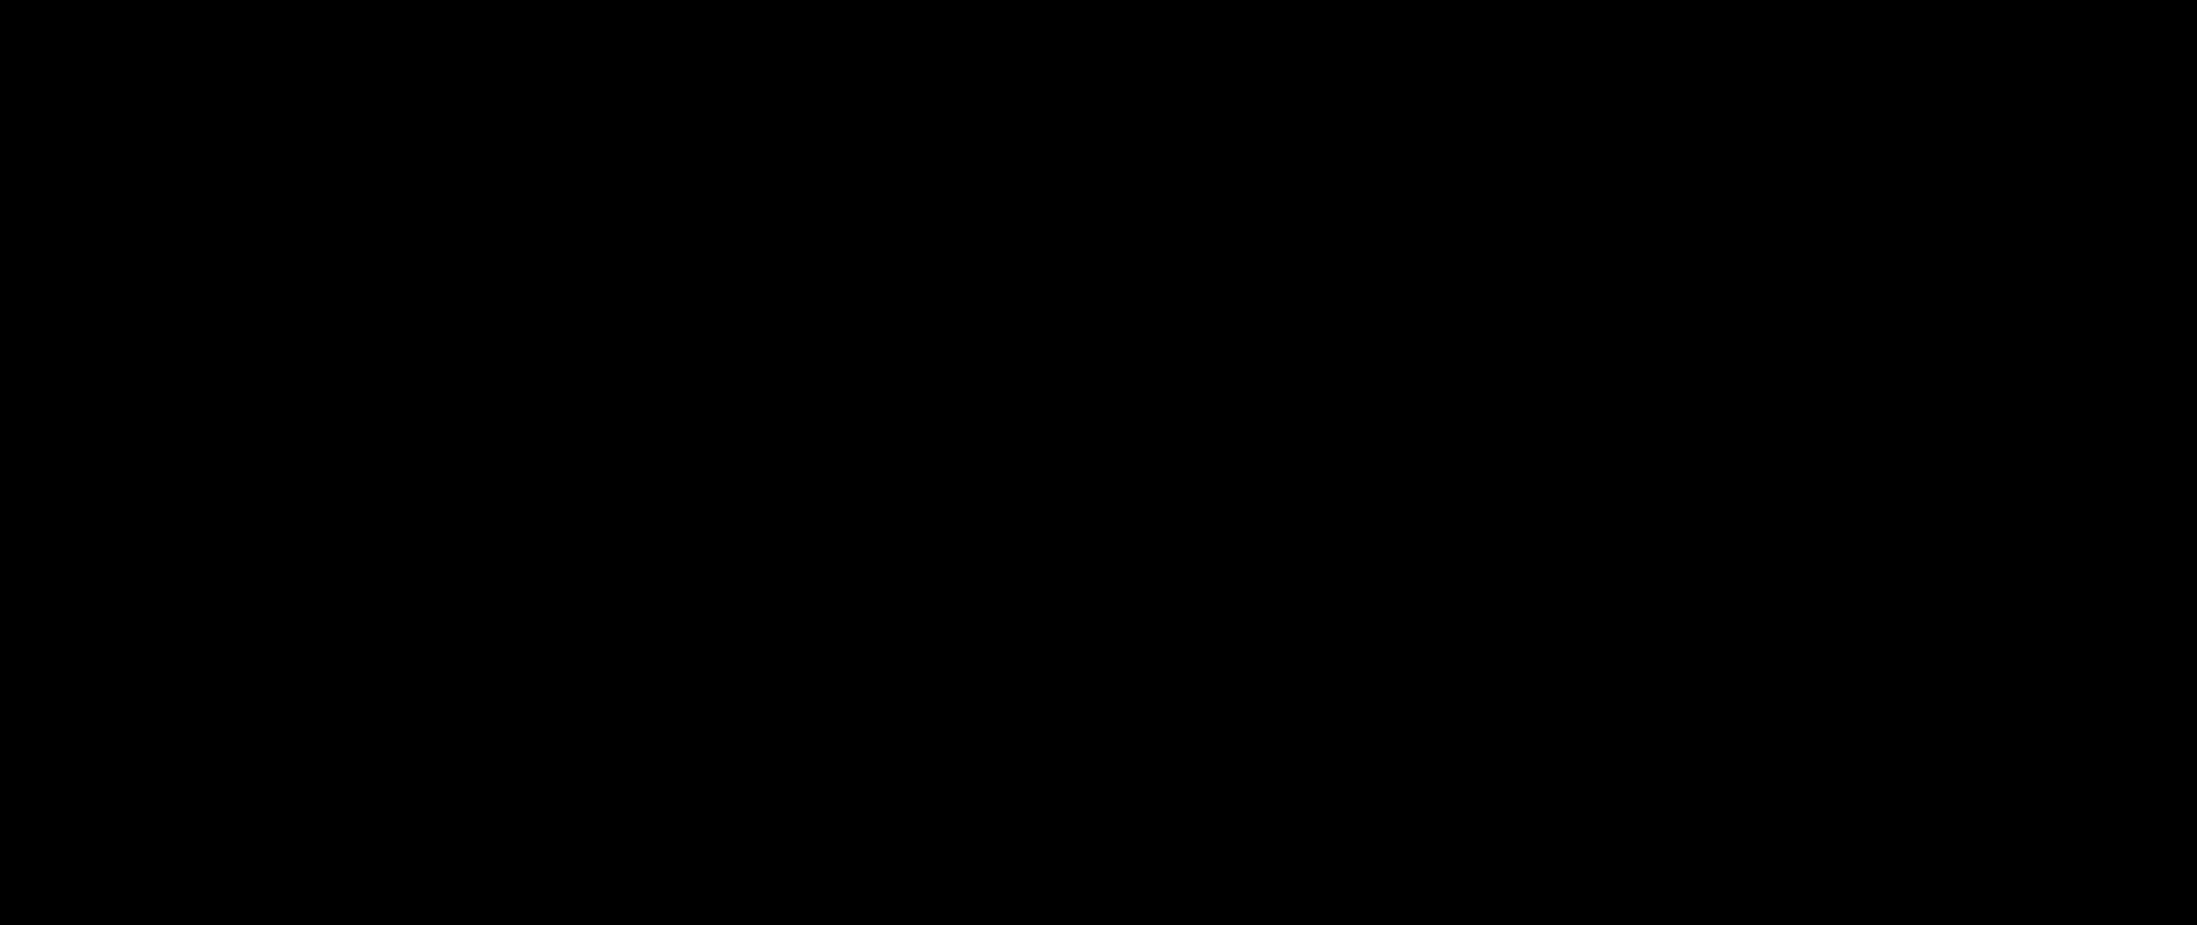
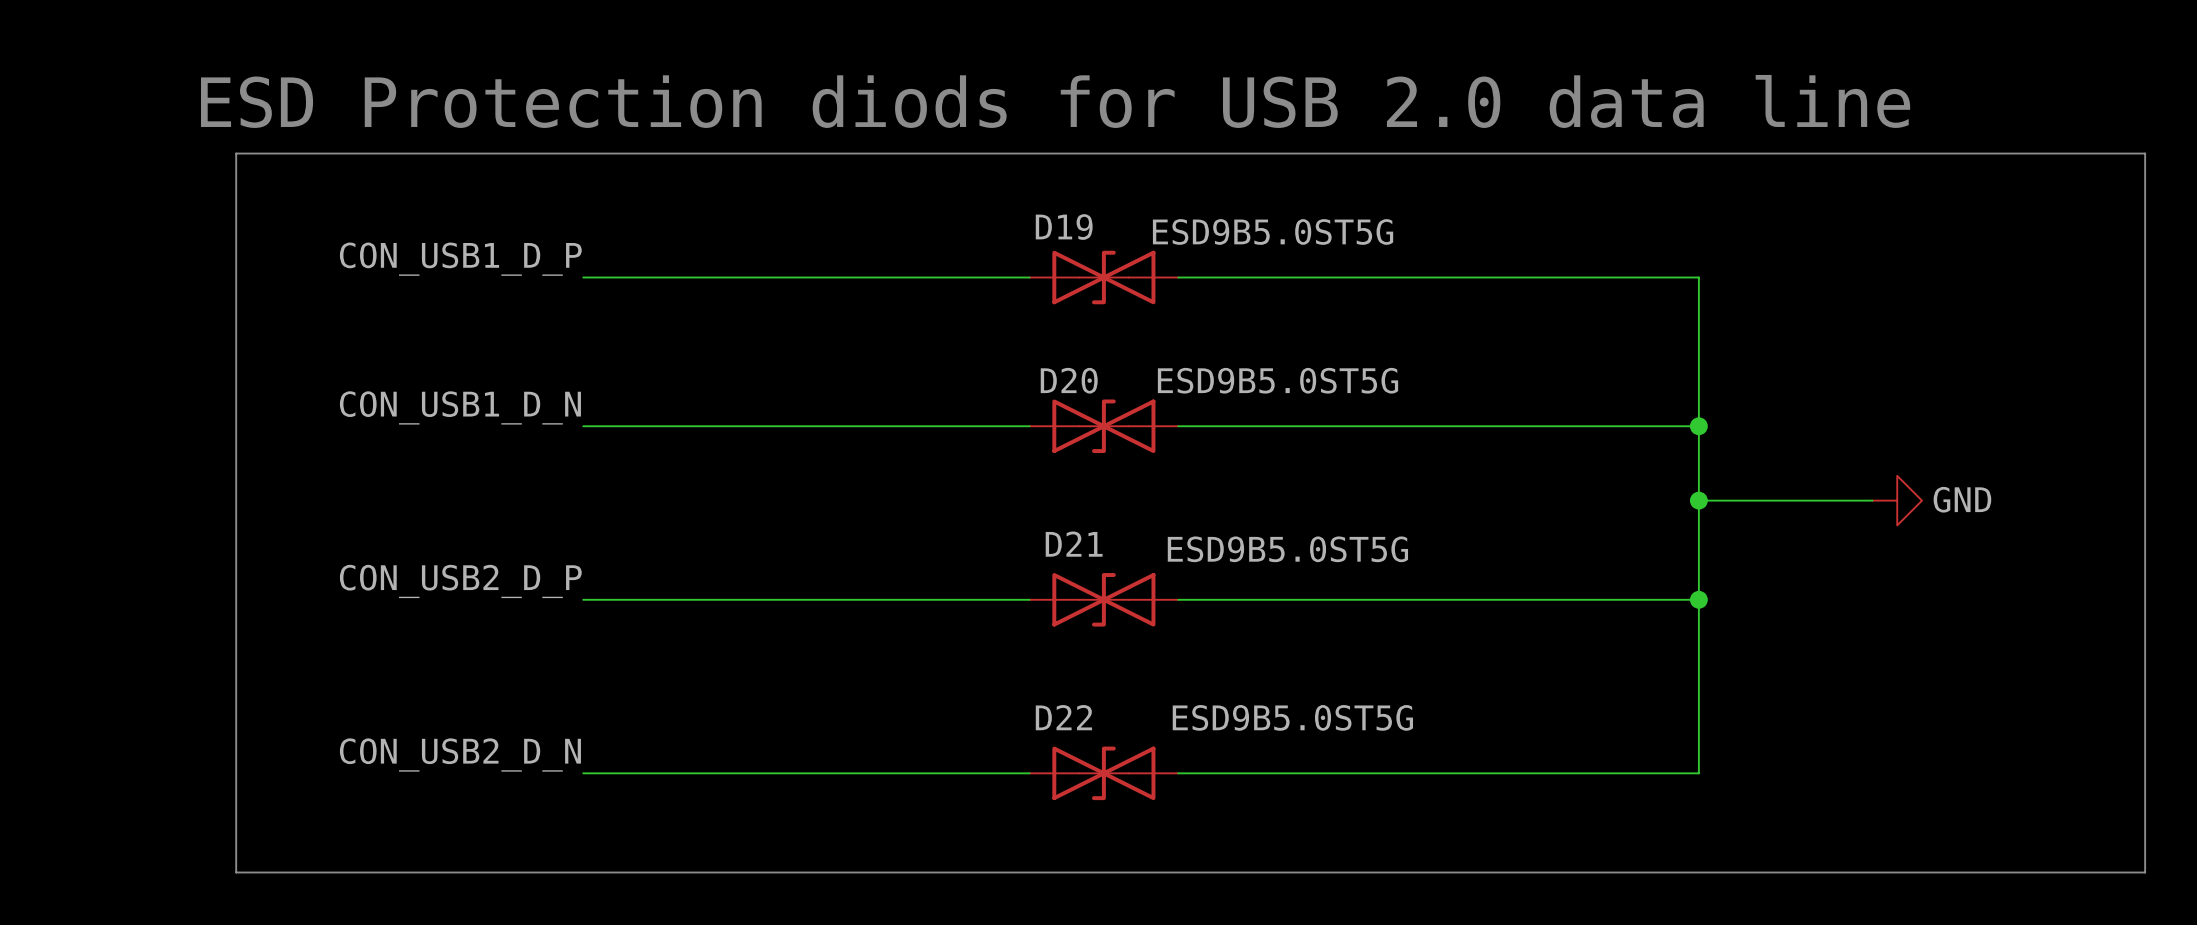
text: none -> ESD Protection diods for USB 2.0 data line (1055, 101)
line: none -> (236, 153) (2145, 153) (2145, 872) (236, 872) (236, 153)
label: none -> CON_USB1_D_P (460, 259)
wire: none -> (583, 277) (1029, 277)
D19: none -> ESD9B5.0ST5G (1103, 277)
wire: none -> (1178, 277) (1698, 277) (1698, 773) (1178, 773)
label: none -> CON_USB1_D_N (460, 407)
wire: none -> (583, 426) (1029, 426)
D20: none -> ESD9B5.0ST5G (1103, 426)
wire: none -> (1178, 426) (1698, 426)
junction: none -> (1698, 426)
wire: none -> (1698, 500) (1872, 500)
junction: none -> (1698, 500)
power symbol: none -> GND (1897, 500)
label: none -> CON_USB2_D_P (460, 581)
wire: none -> (583, 599) (1029, 599)
D21: none -> ESD9B5.0ST5G (1103, 599)
wire: none -> (1178, 599) (1698, 599)
junction: none -> (1698, 599)
label: none -> CON_USB2_D_N (460, 755)
wire: none -> (583, 773) (1029, 773)
D22: none -> ESD9B5.0ST5G (1103, 773)

